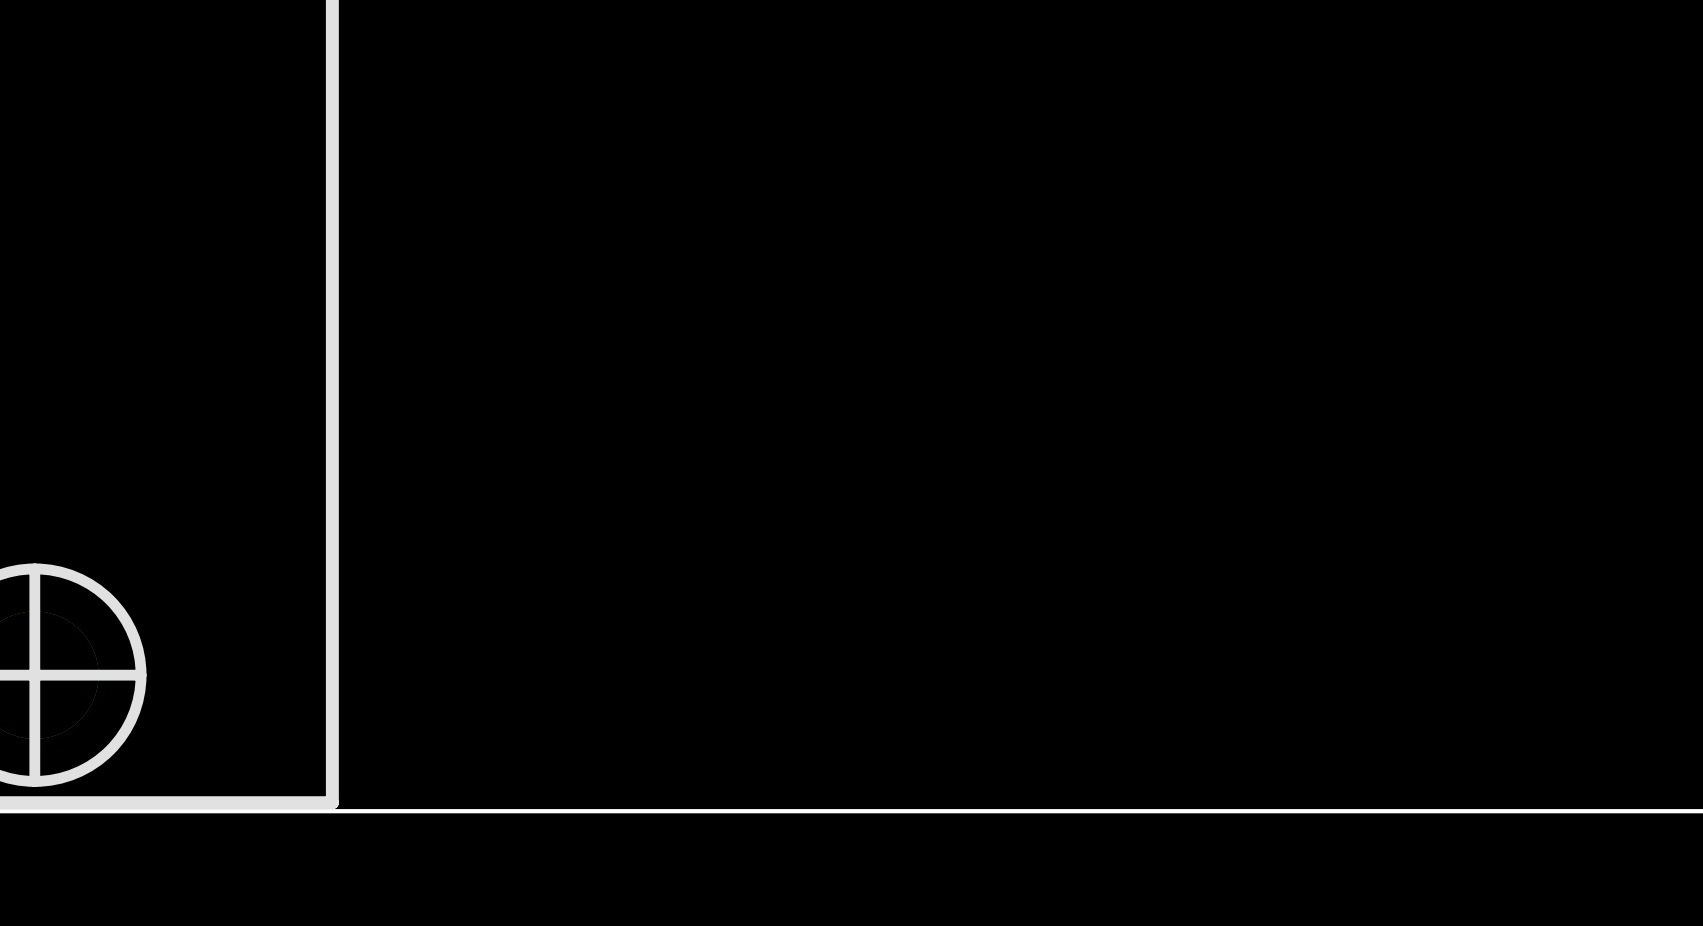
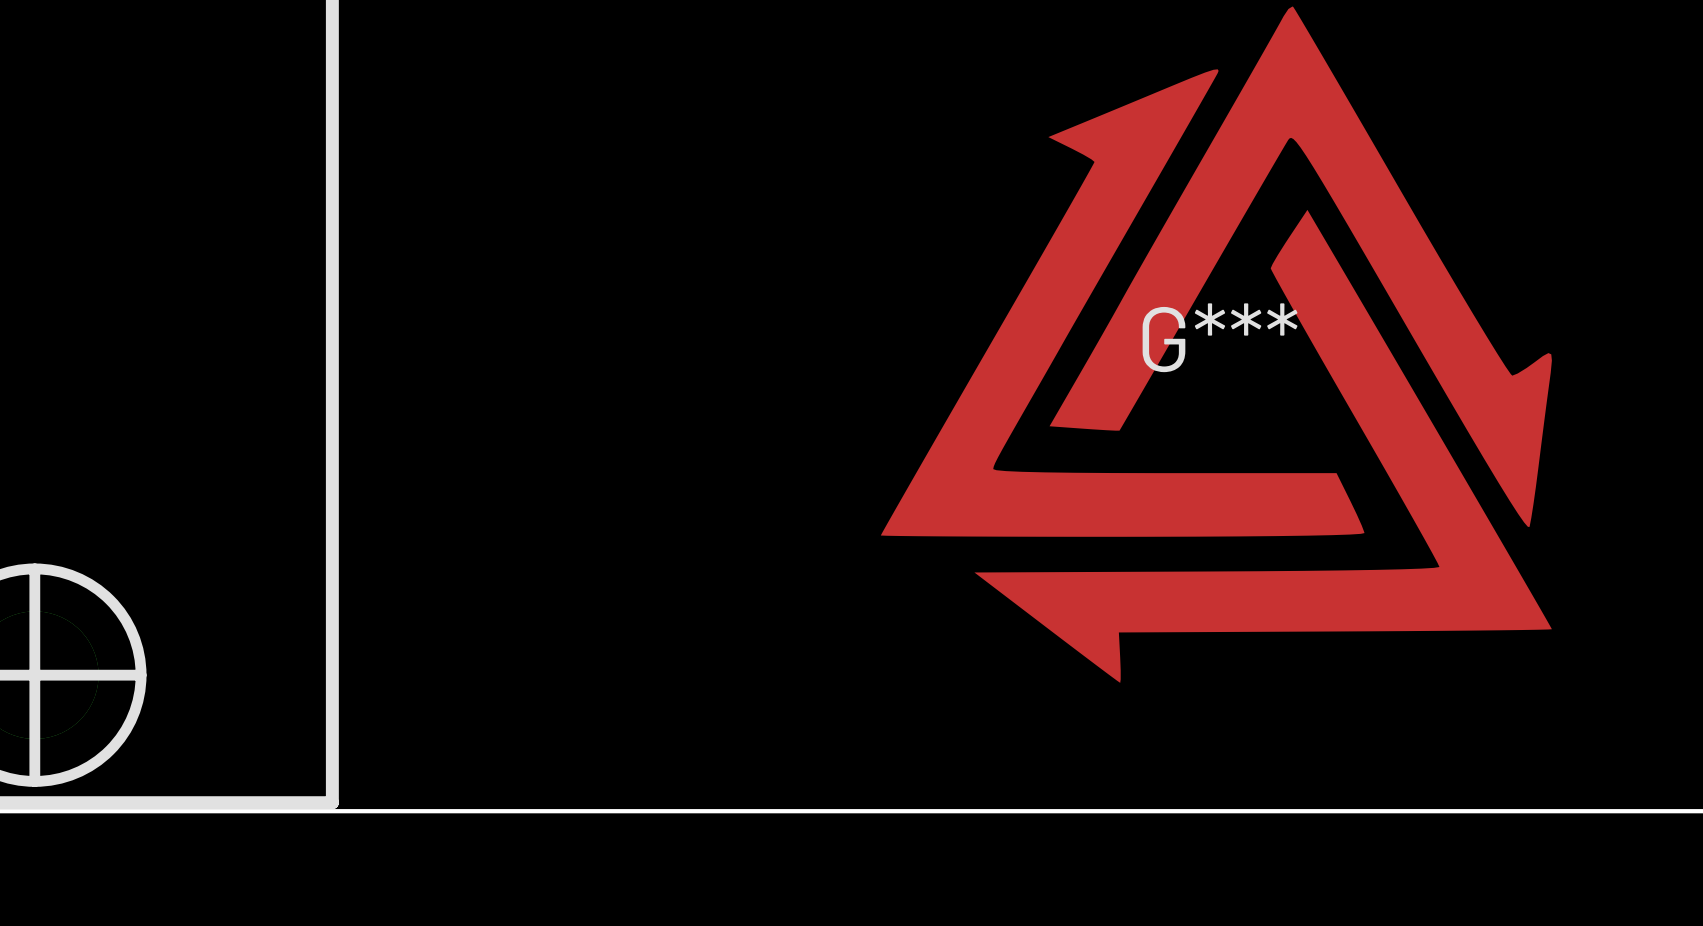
G***: none -> (1216, 344)

